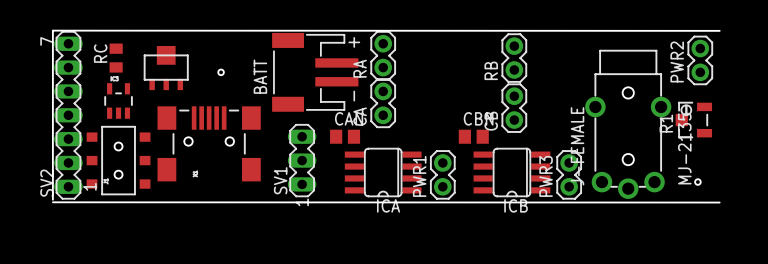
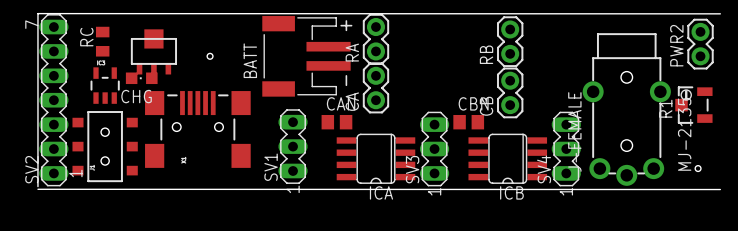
CHG: none -> (141, 78)
SV3: none -> (434, 149)
SV4: none -> (566, 149)
PWR1: (442, 174) -> none
PWR3: (569, 174) -> none

